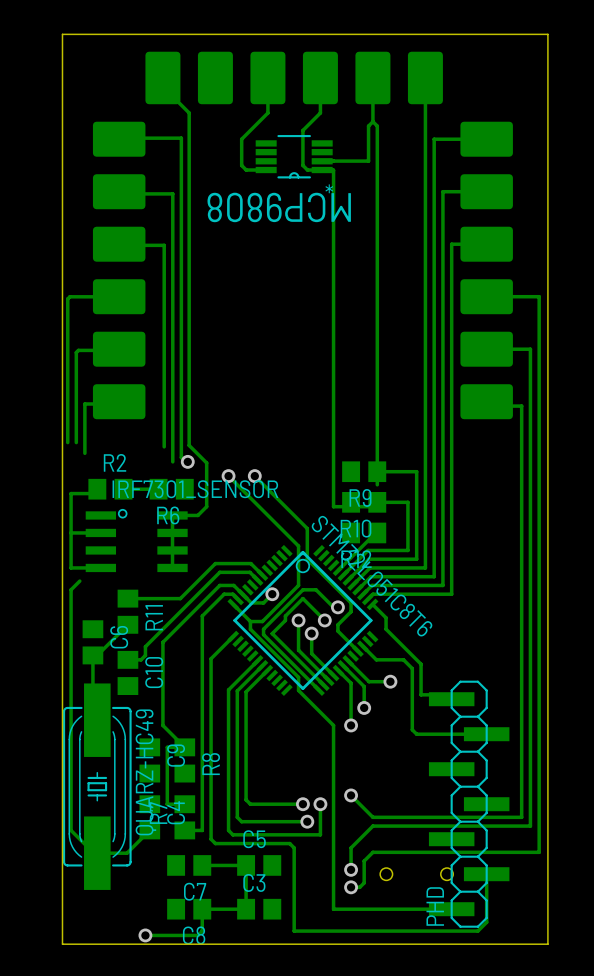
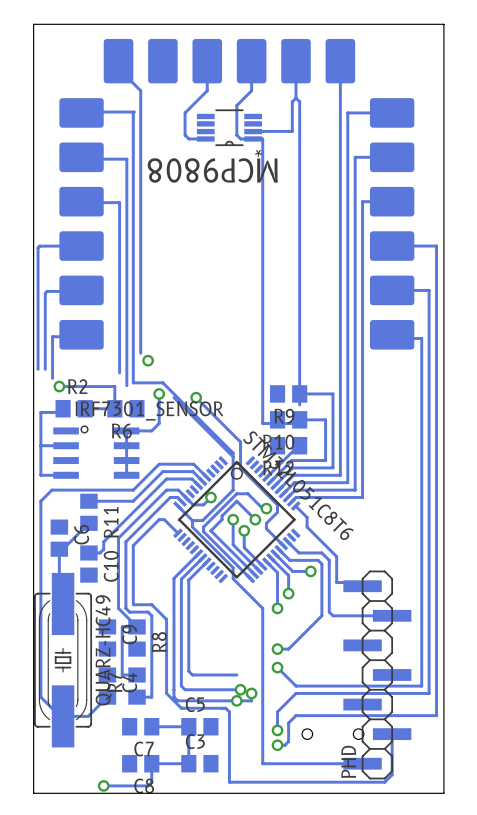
track: (181, 138) (181, 457) (187, 461) -> (134, 112) (133, 382) (162, 382) (233, 453) (233, 456)
track: (189, 423) (189, 445) (206, 462) (206, 506) (197, 515) -> (159, 393) (159, 423) (151, 430) (148, 430)
via: none -> (148, 360)
via: (187, 461) -> none
track: none -> (59, 386) (114, 386) (114, 408)
via: none -> (59, 386)
via: none -> (159, 393)
via: (228, 476) -> none
track: (79, 581) (71, 589) (71, 598) -> (206, 477) (193, 464) (159, 464) (133, 490) (51, 490) (40, 501)
track: (202, 616) (202, 734) -> (151, 515) (125, 541) (125, 608) (129, 612) (148, 612) (151, 615)
track: (233, 636) (211, 658) (211, 839) (215, 843) (237, 843) -> (177, 533) (164, 519) (159, 519) (133, 545) (133, 604) (151, 604) (166, 619) (166, 693) (181, 708)
track: none -> (279, 549) (289, 560) (318, 560) (321, 564) (321, 615) (288, 649) (277, 649)
via: none -> (277, 649)
via: (302, 804) -> none
track: (320, 804) (320, 826) -> none
via: (320, 804) -> none
via: none -> (251, 693)
via: none -> (236, 700)

